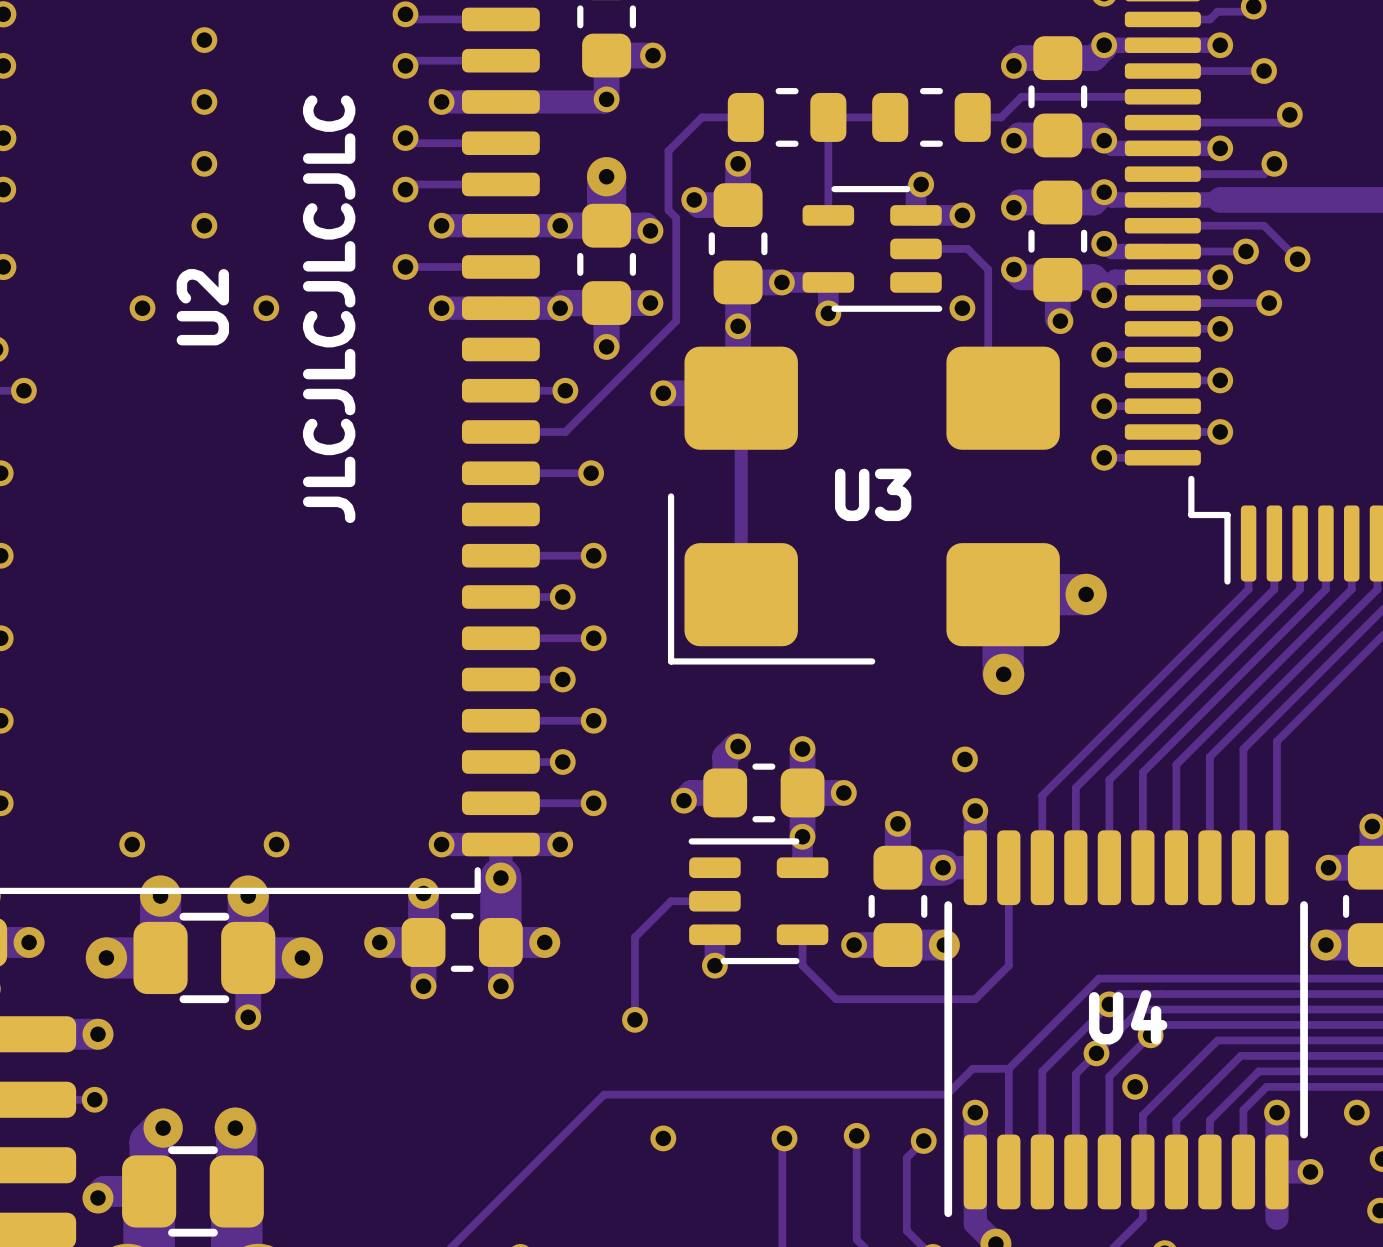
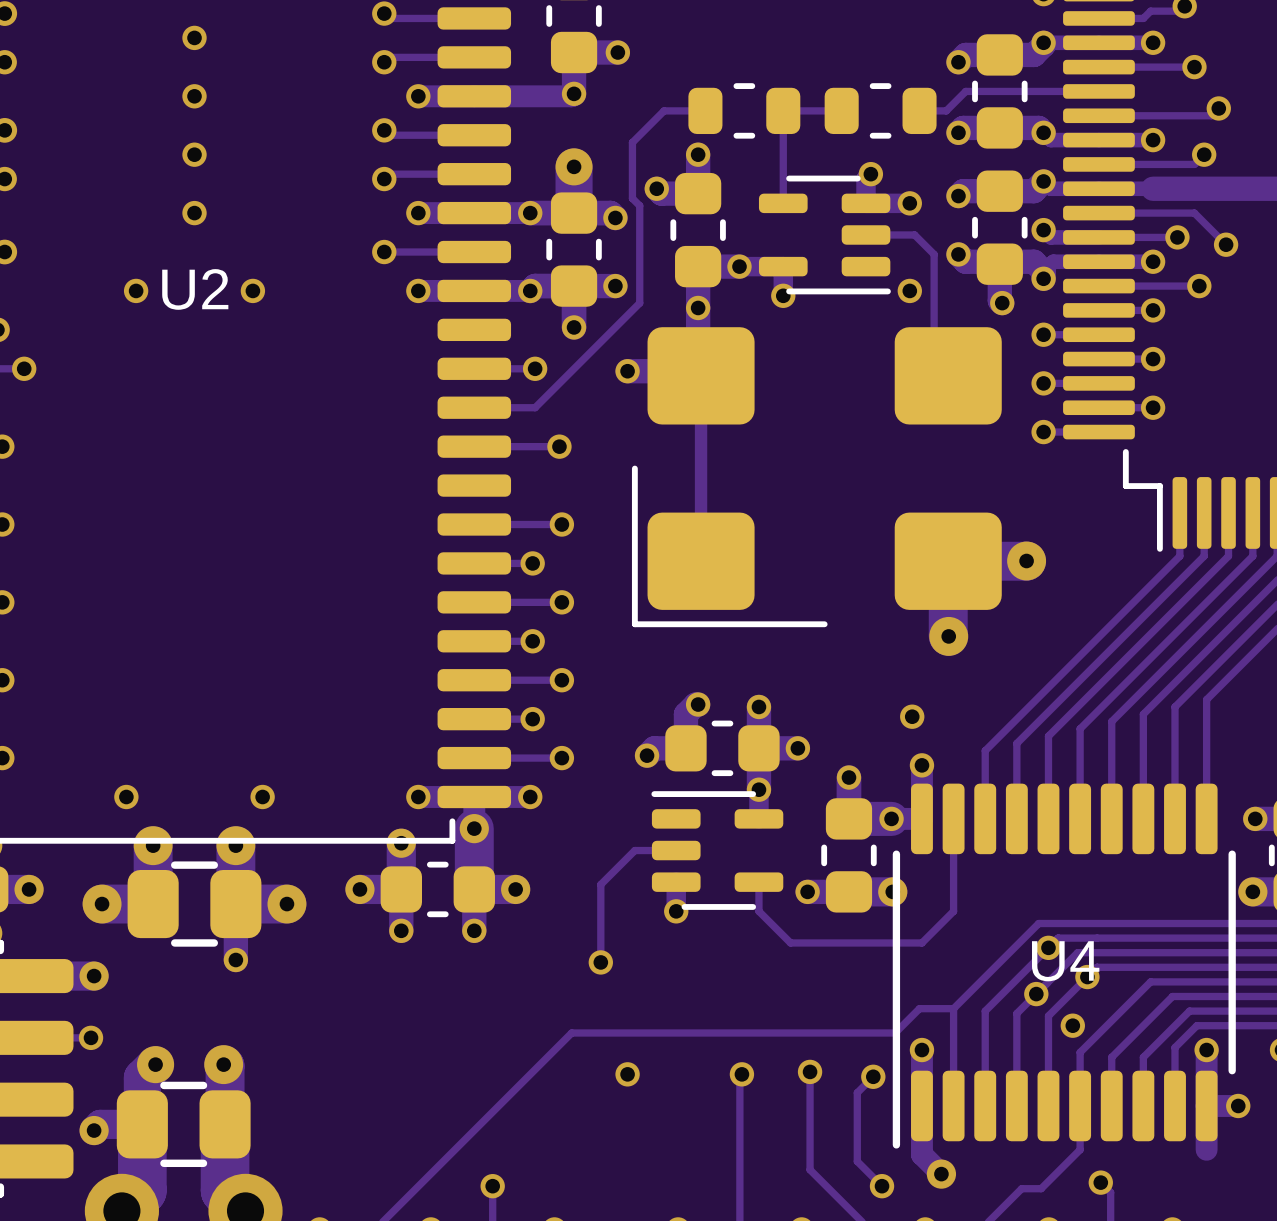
U2 name rotation: 0° (202, 307) -> 90° clockwise (195, 289)
text: JLCJLCJLCJLC (329, 309) -> none
U3 name: U3 (873, 494) -> none

